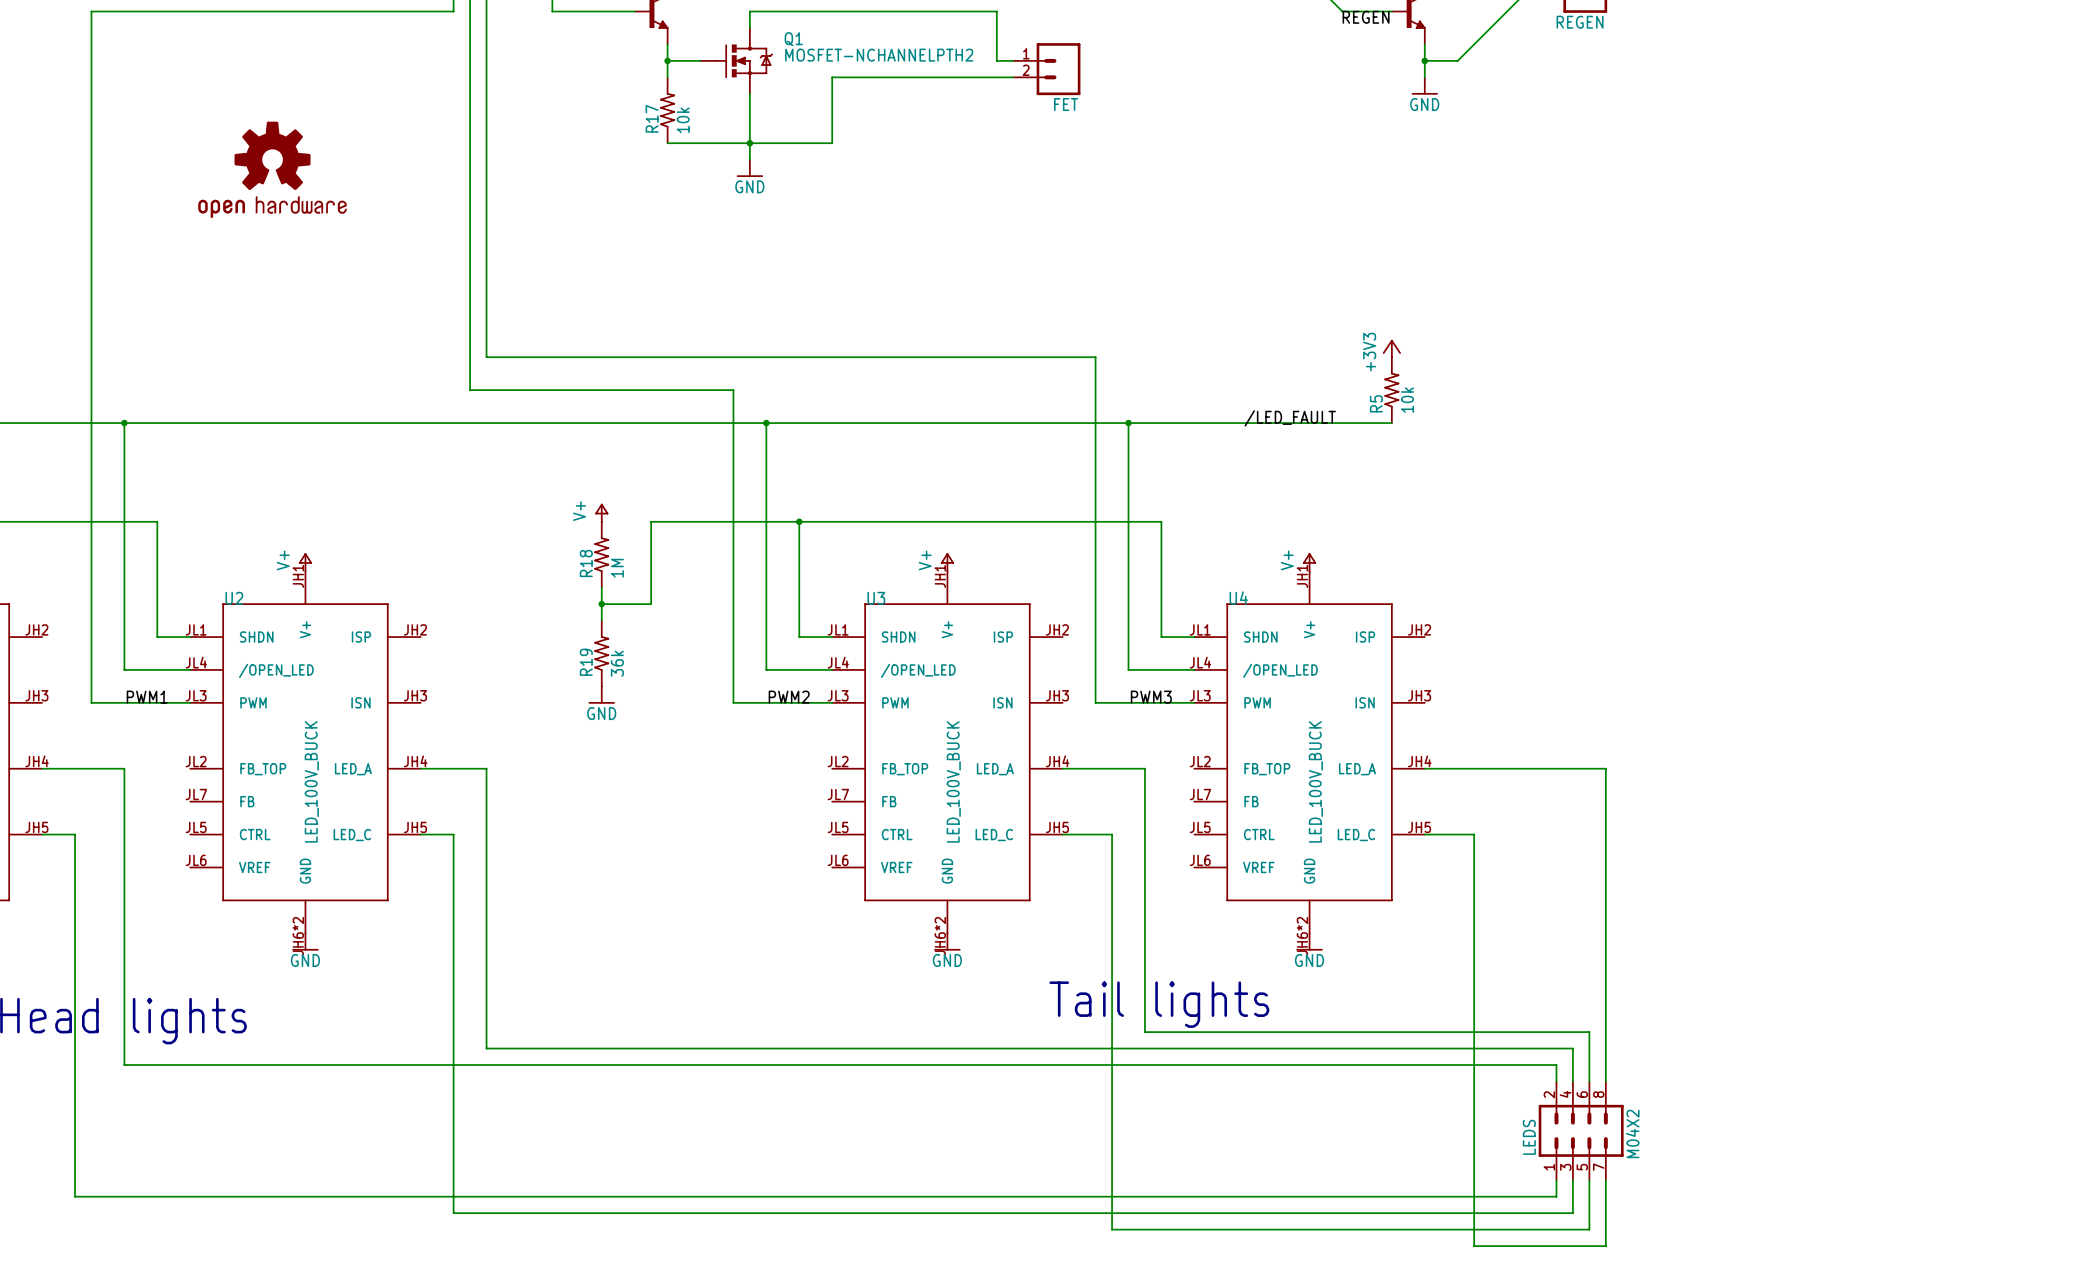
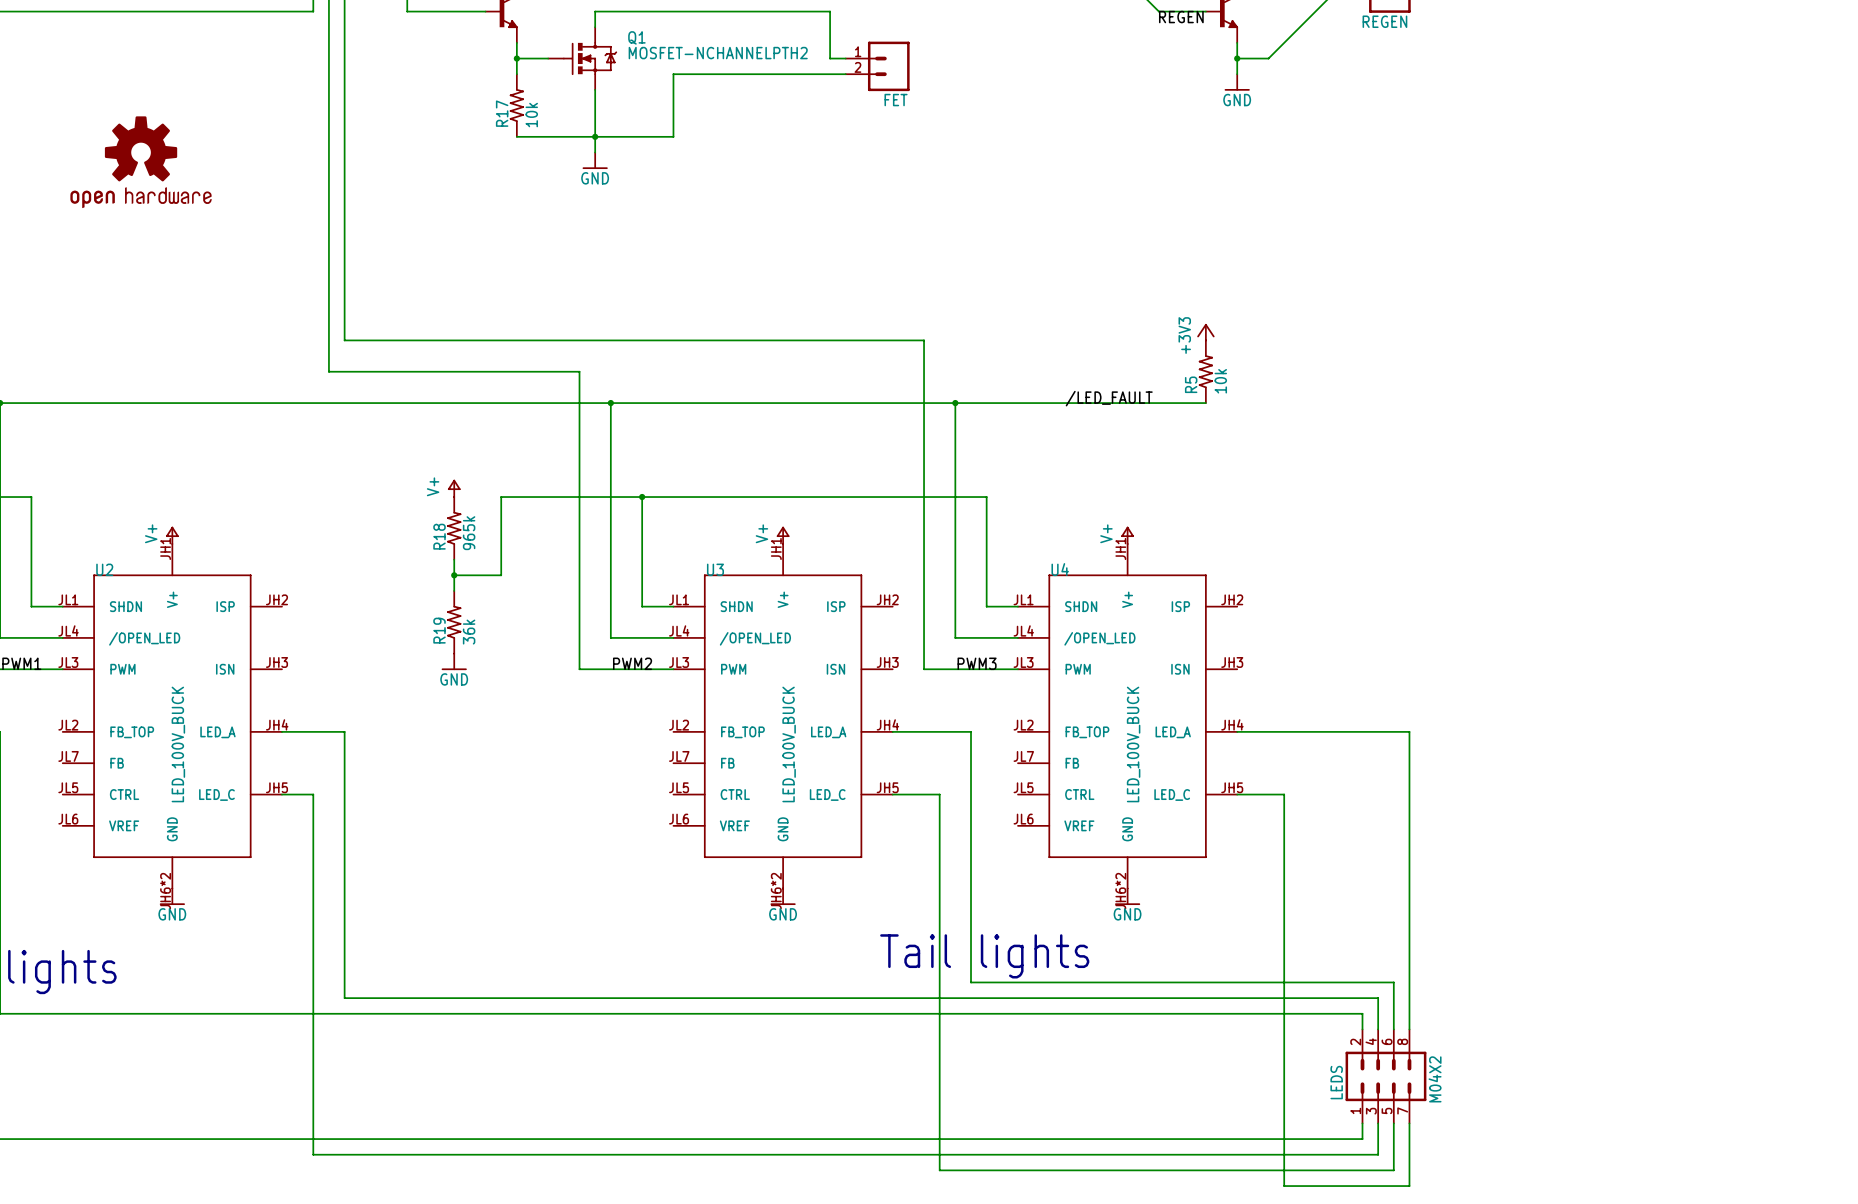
R18 value: 1M (617, 568) -> 965k (469, 533)

